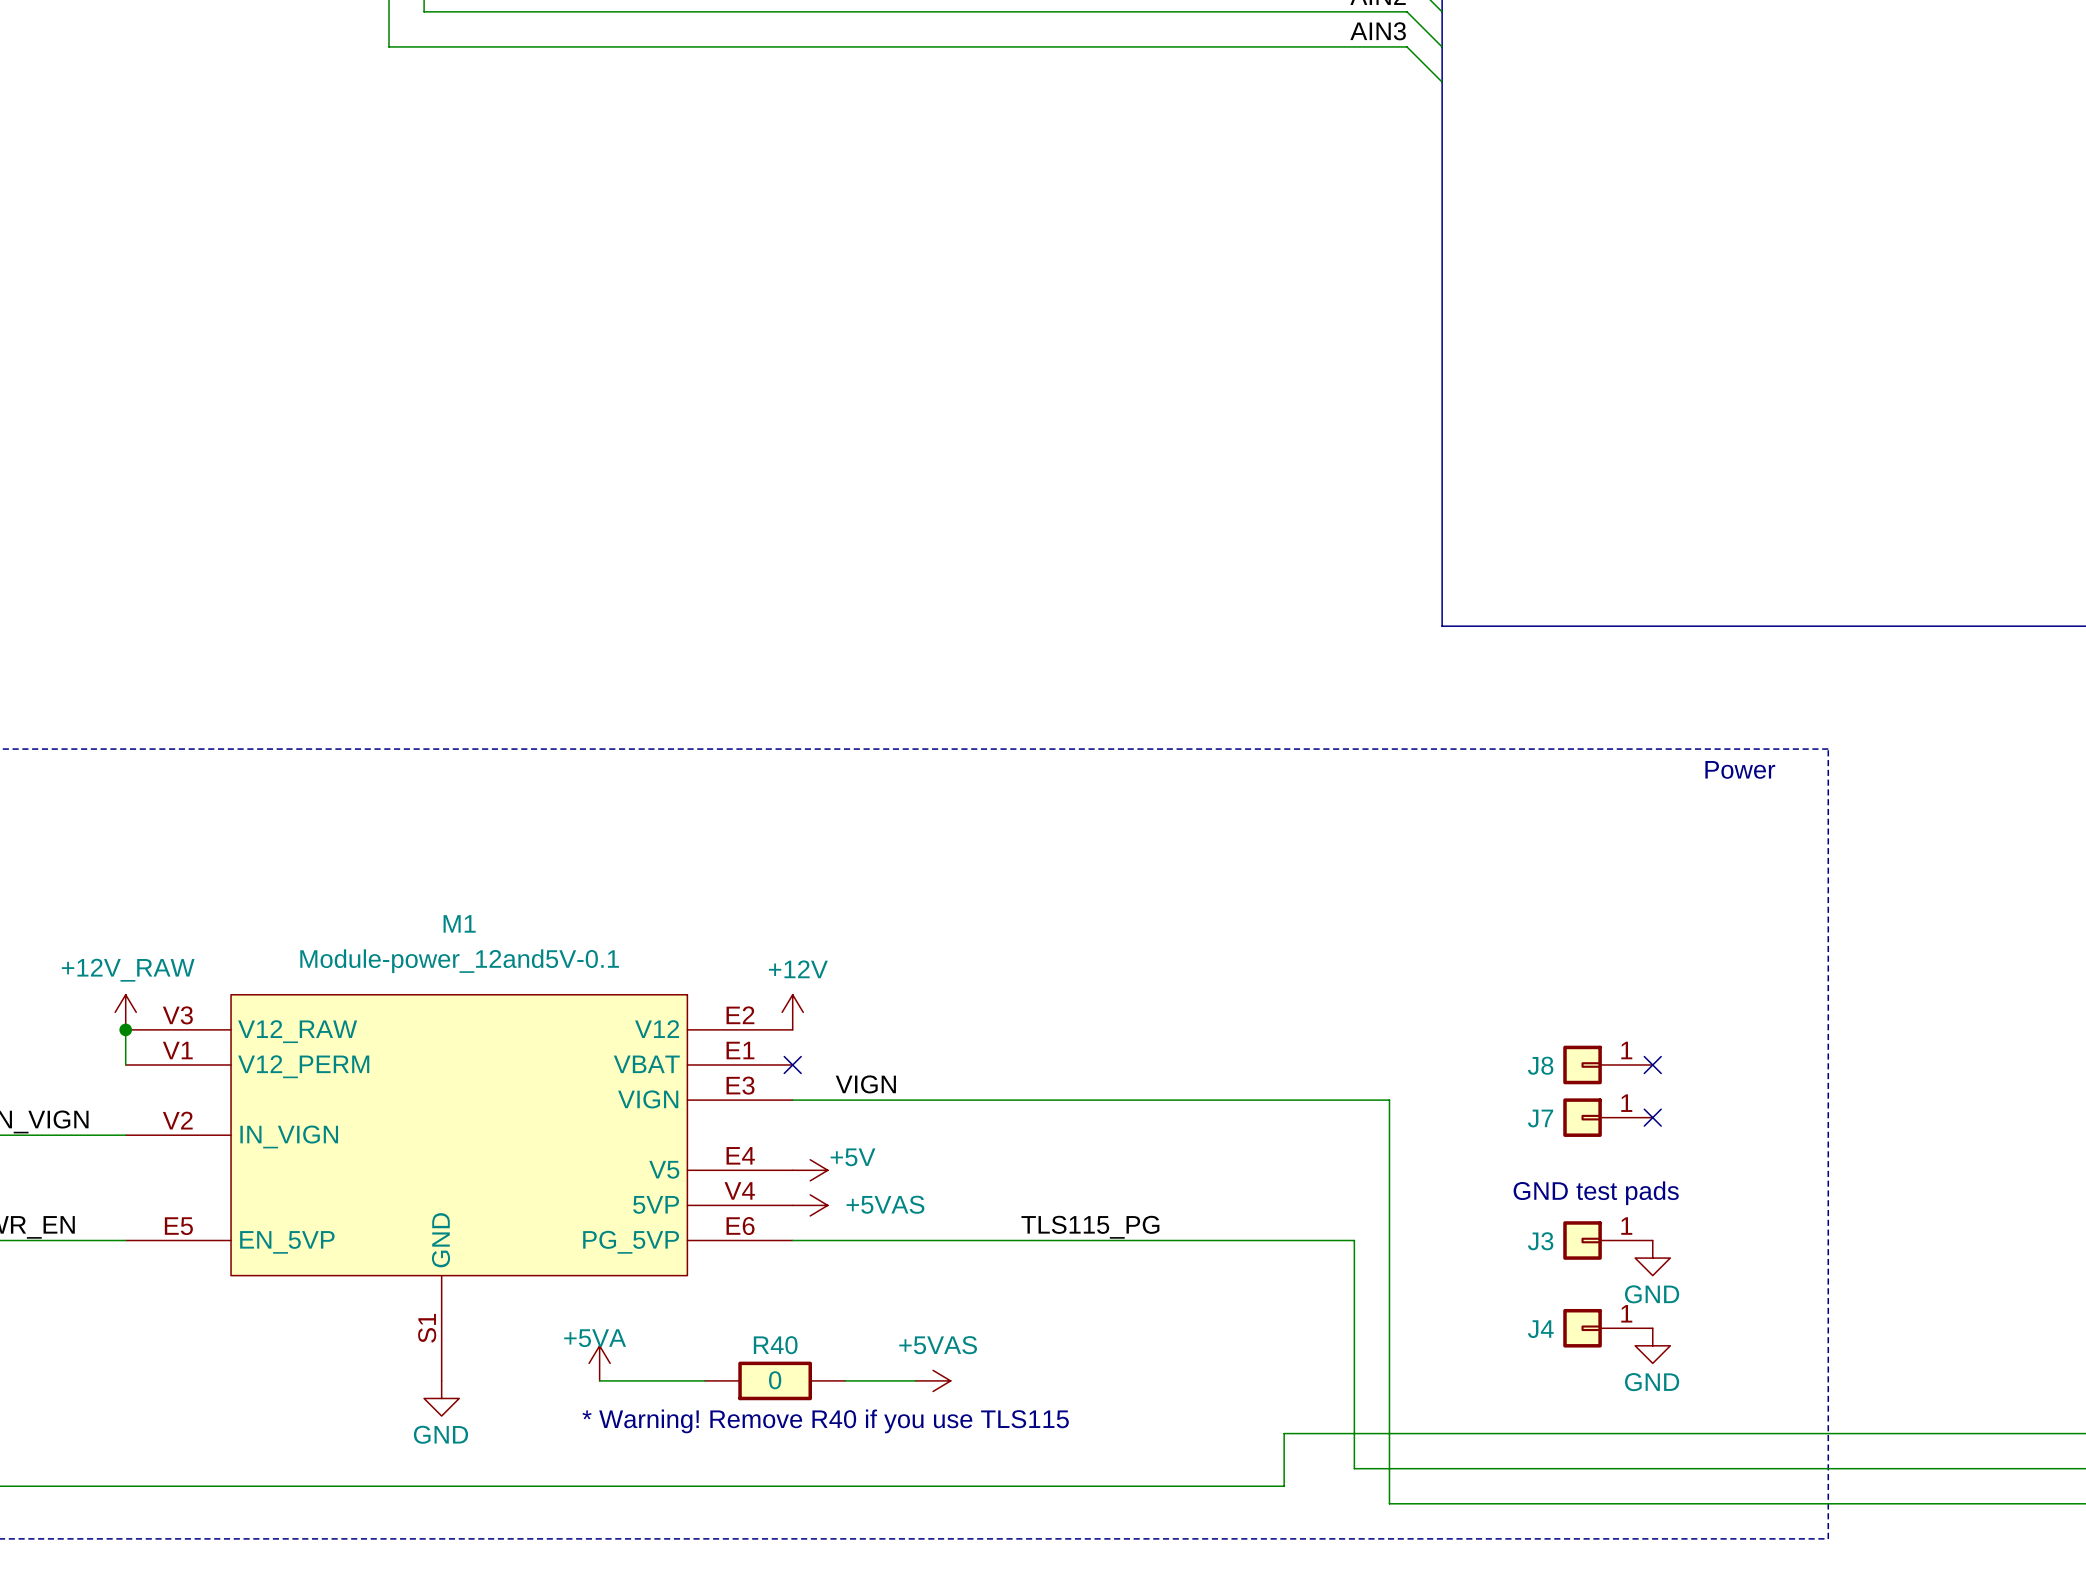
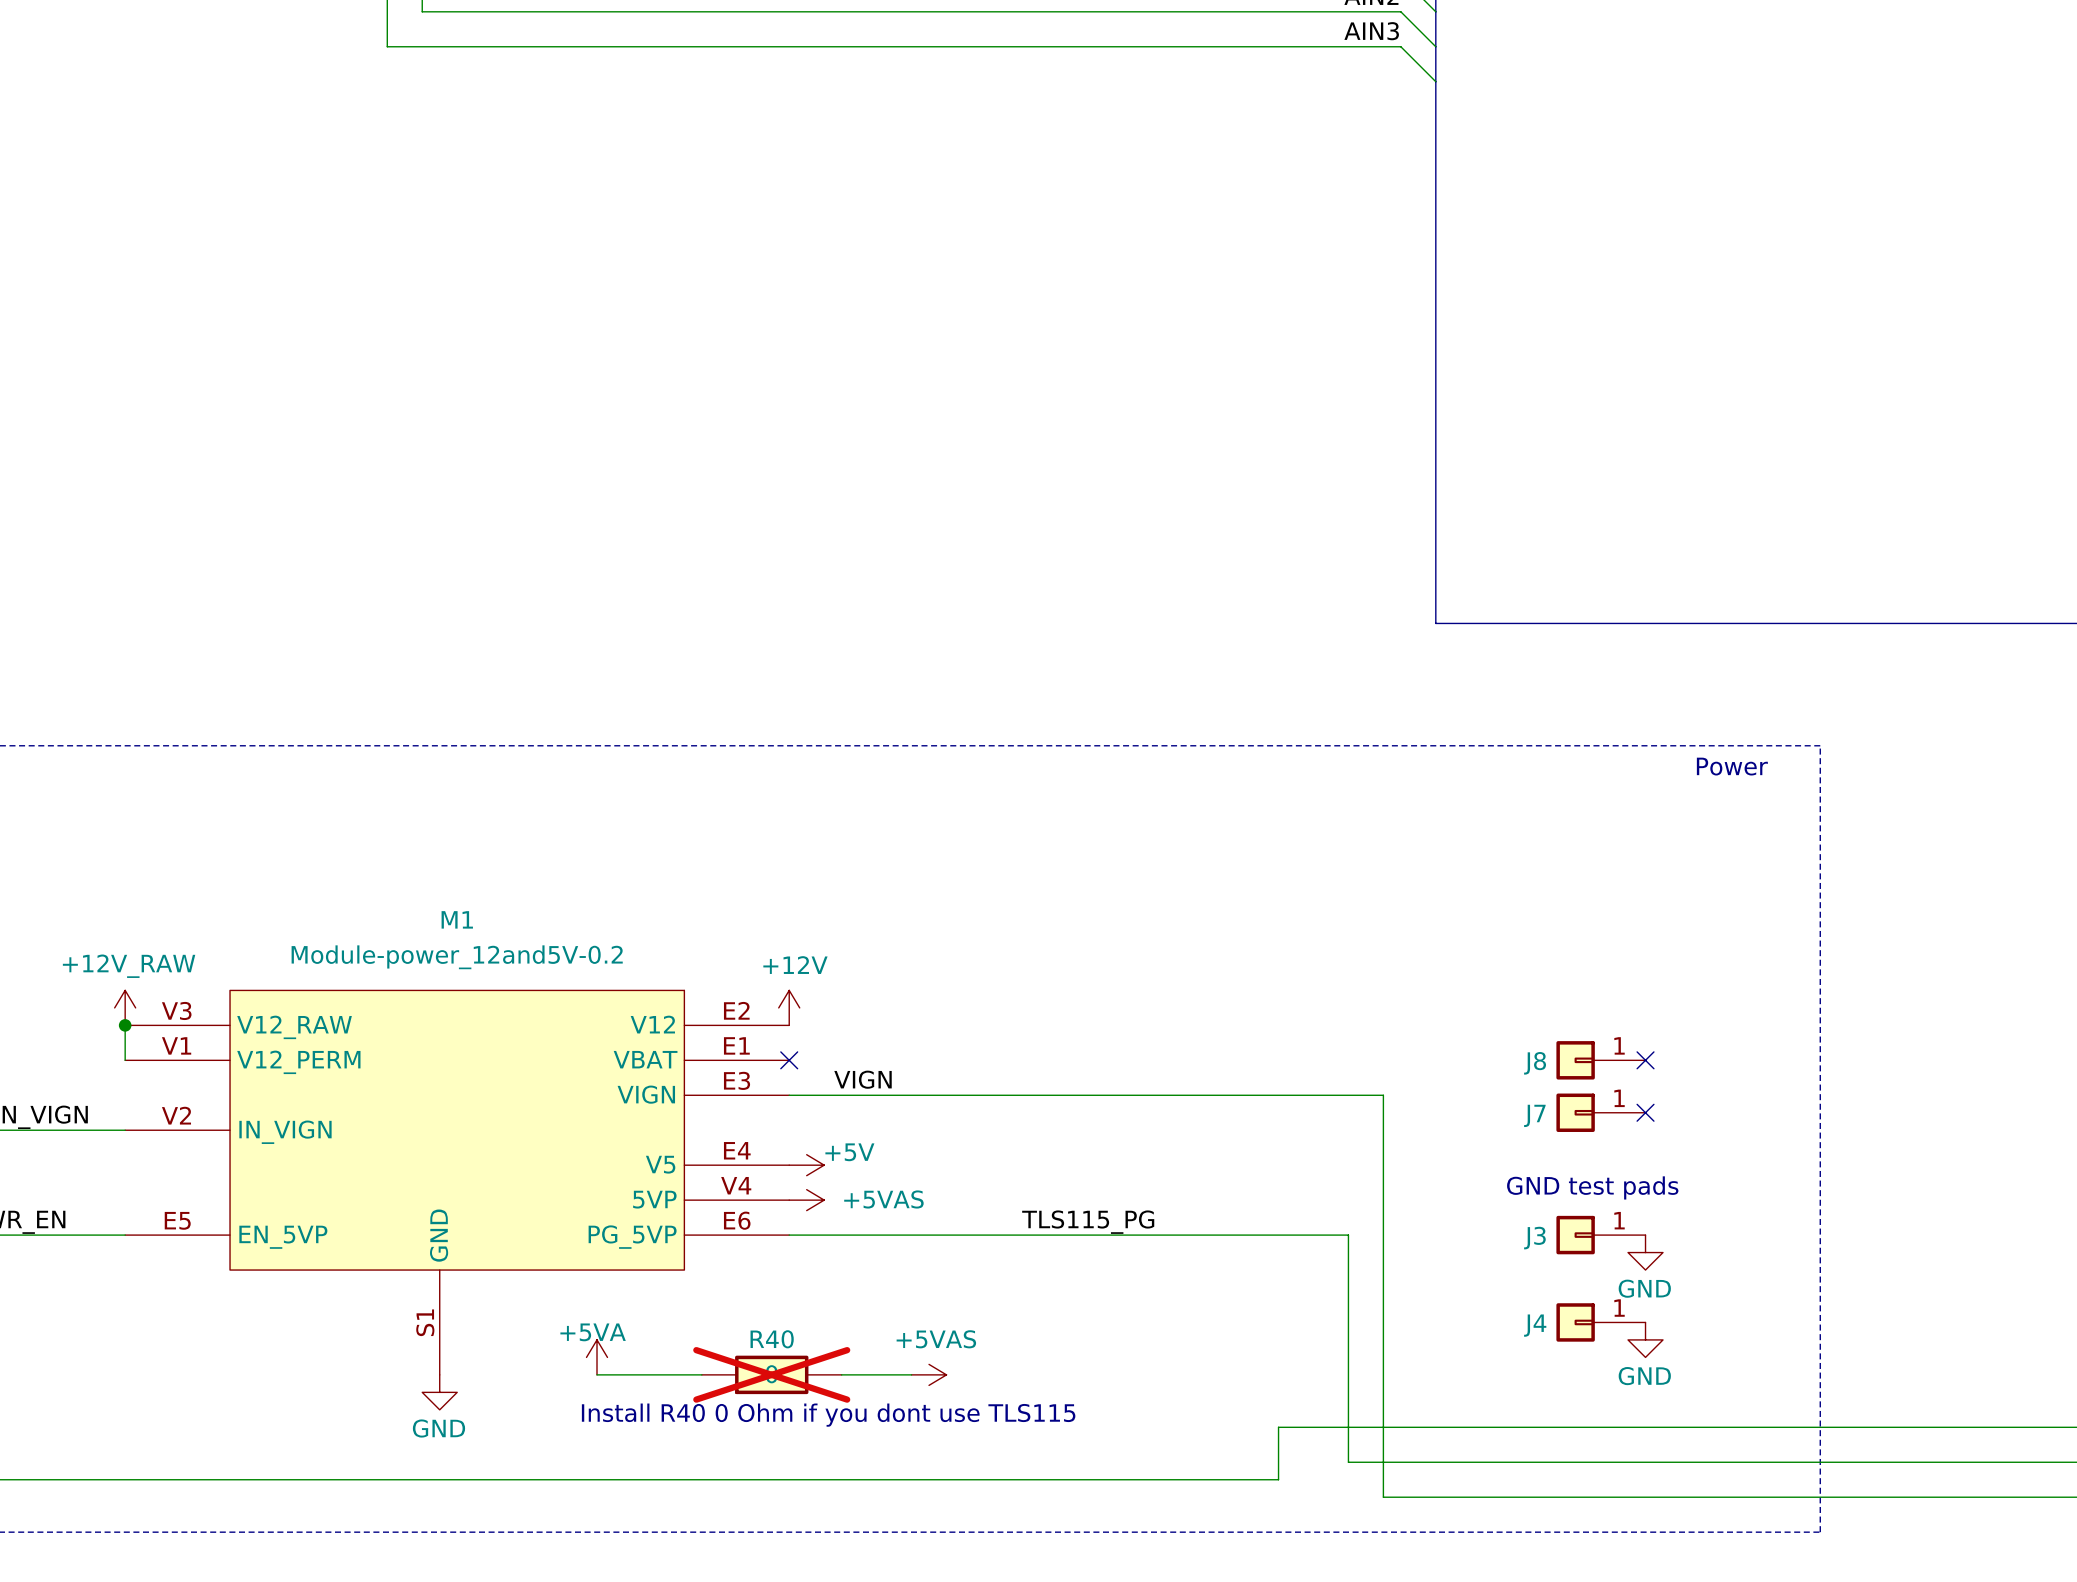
M1 value: Module-power_12and5V-0.1 (459, 961) -> Module-power_12and5V-0.2 (457, 957)
R40 do-not-place cross: none -> (771, 1374)
text: * Warning! Remove R40 if you use TLS115 (825, 1421) -> Install R40 0 Ohm if you dont use TLS115 (828, 1415)

